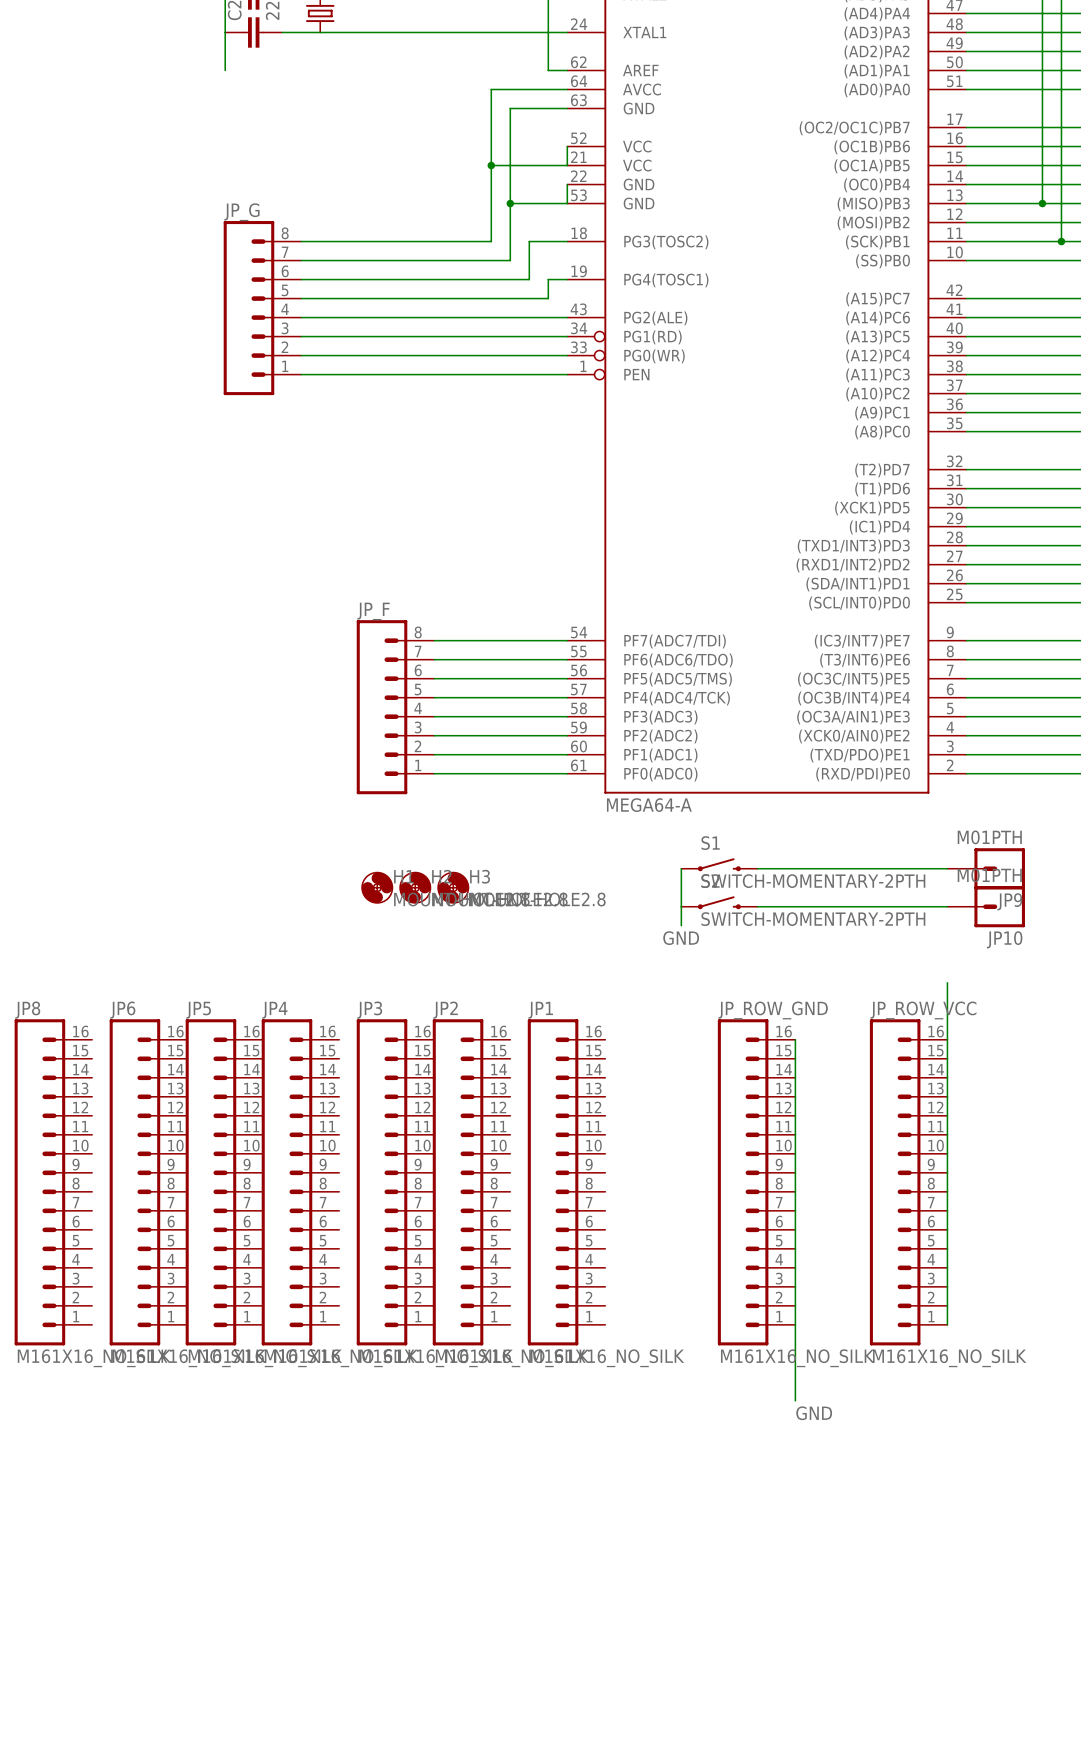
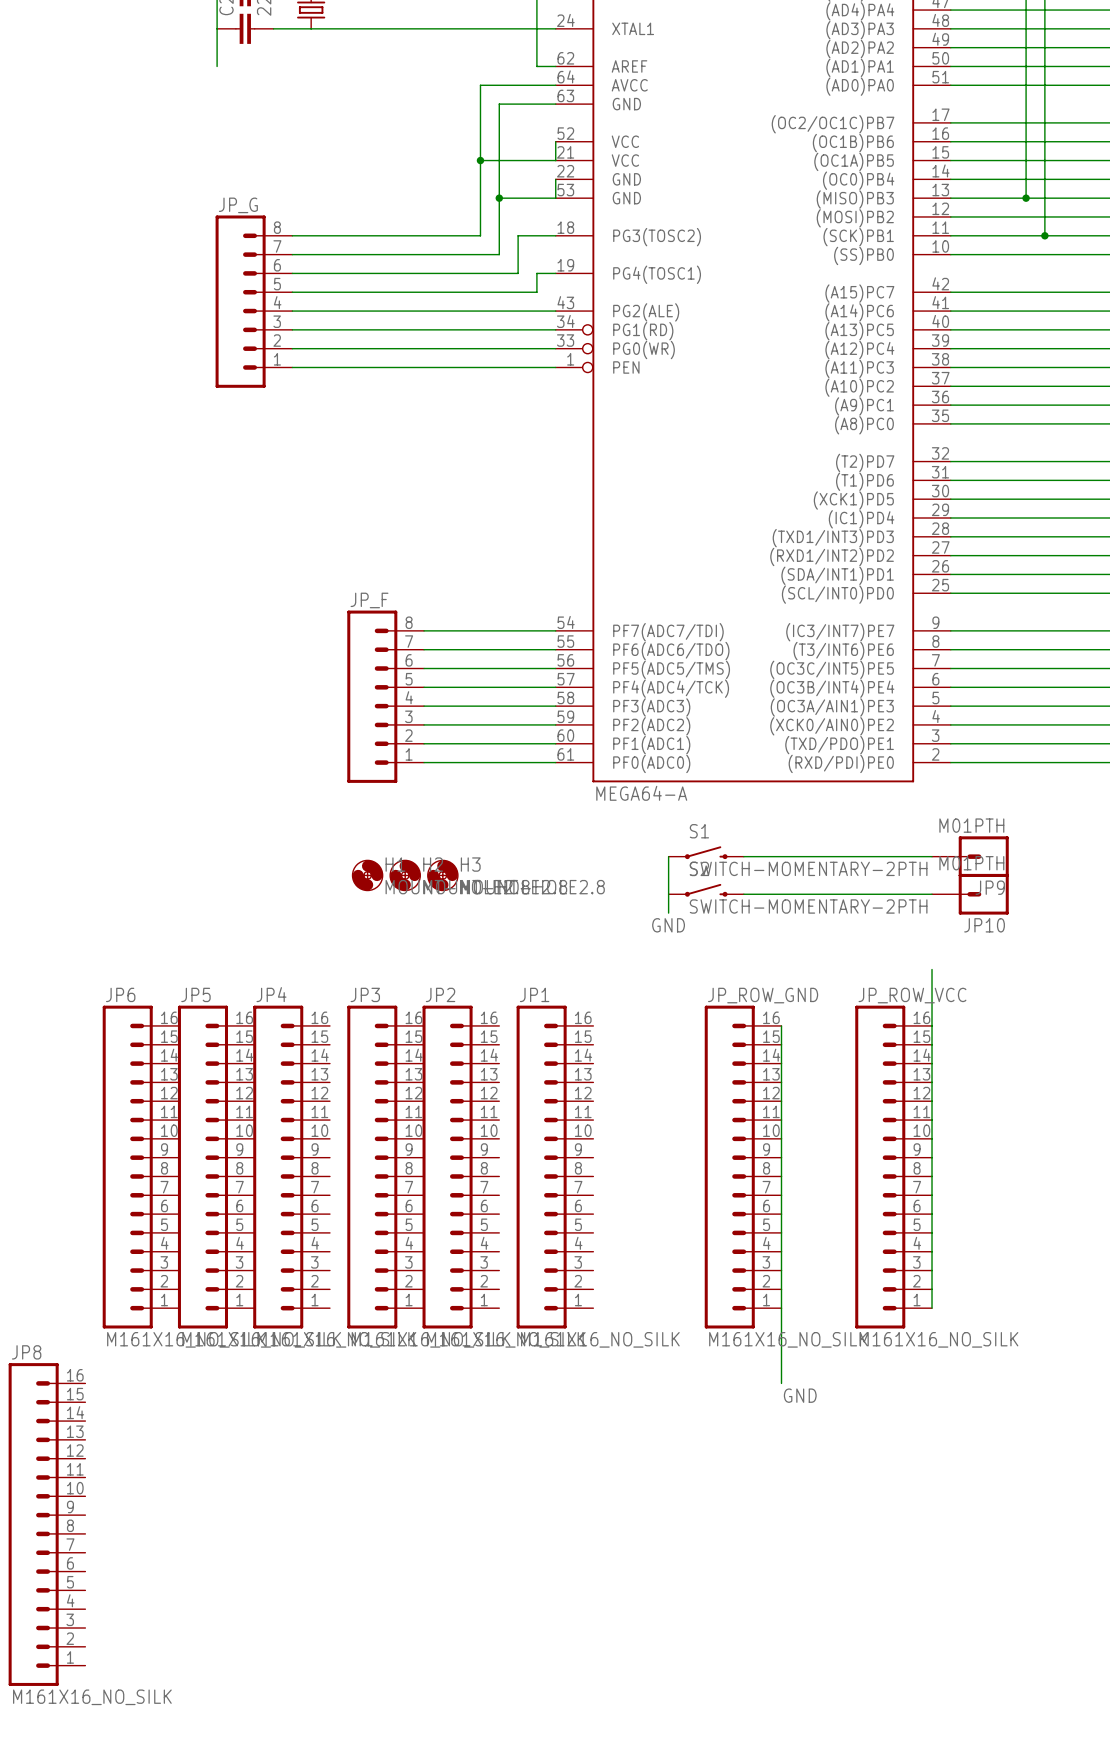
JP8 position: (53, 1182) -> (47, 1524)

